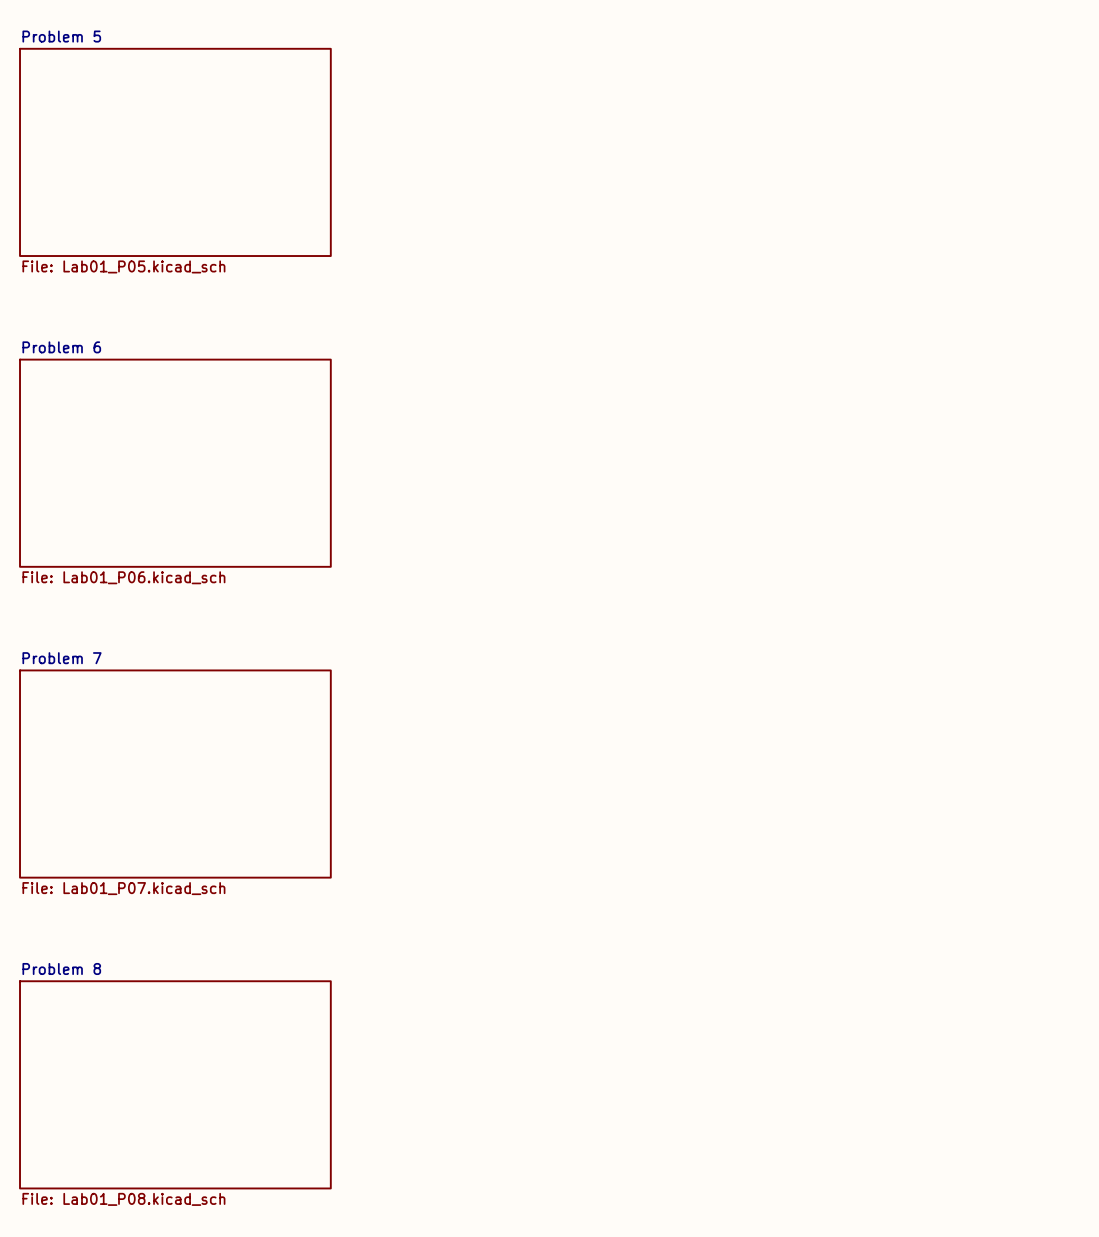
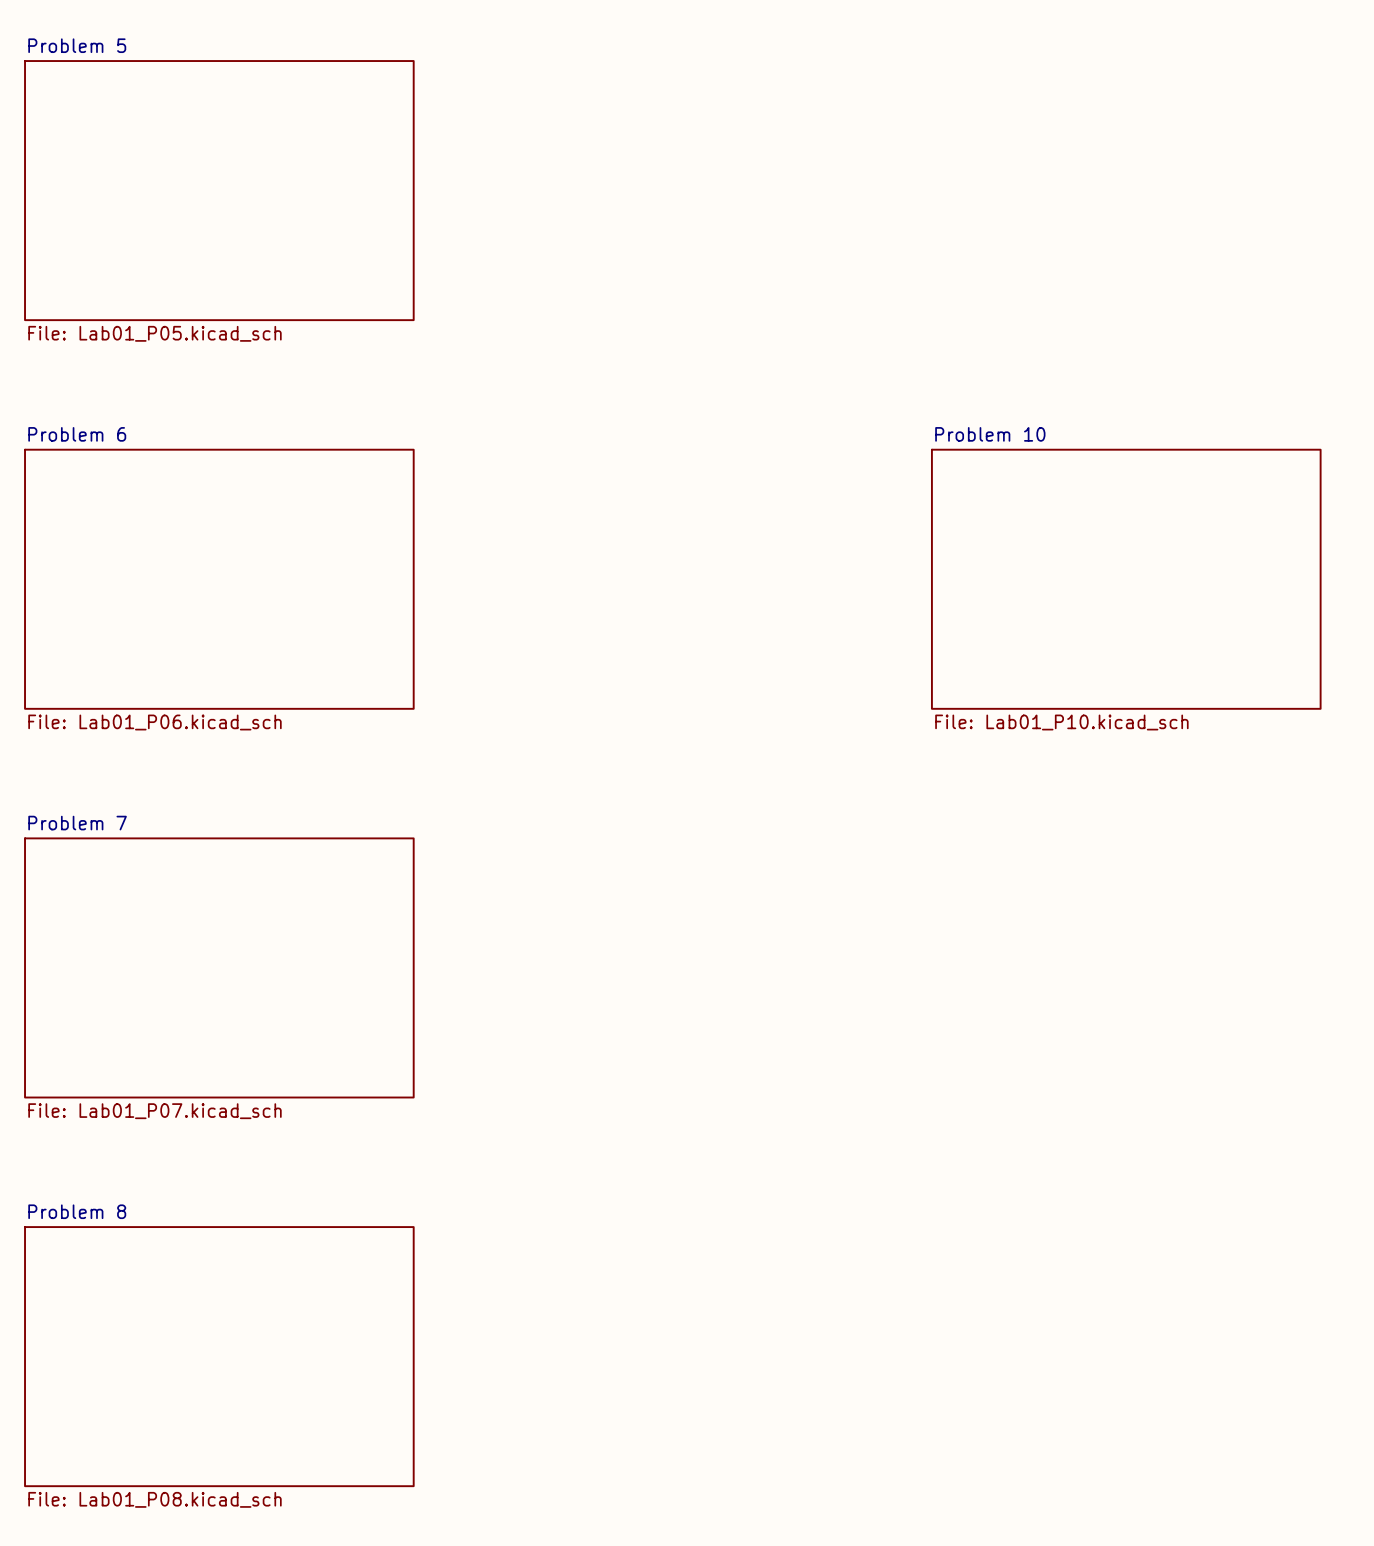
sheet Problem 10: none -> File: Lab01_P10.kicad_sch (1126, 579)

